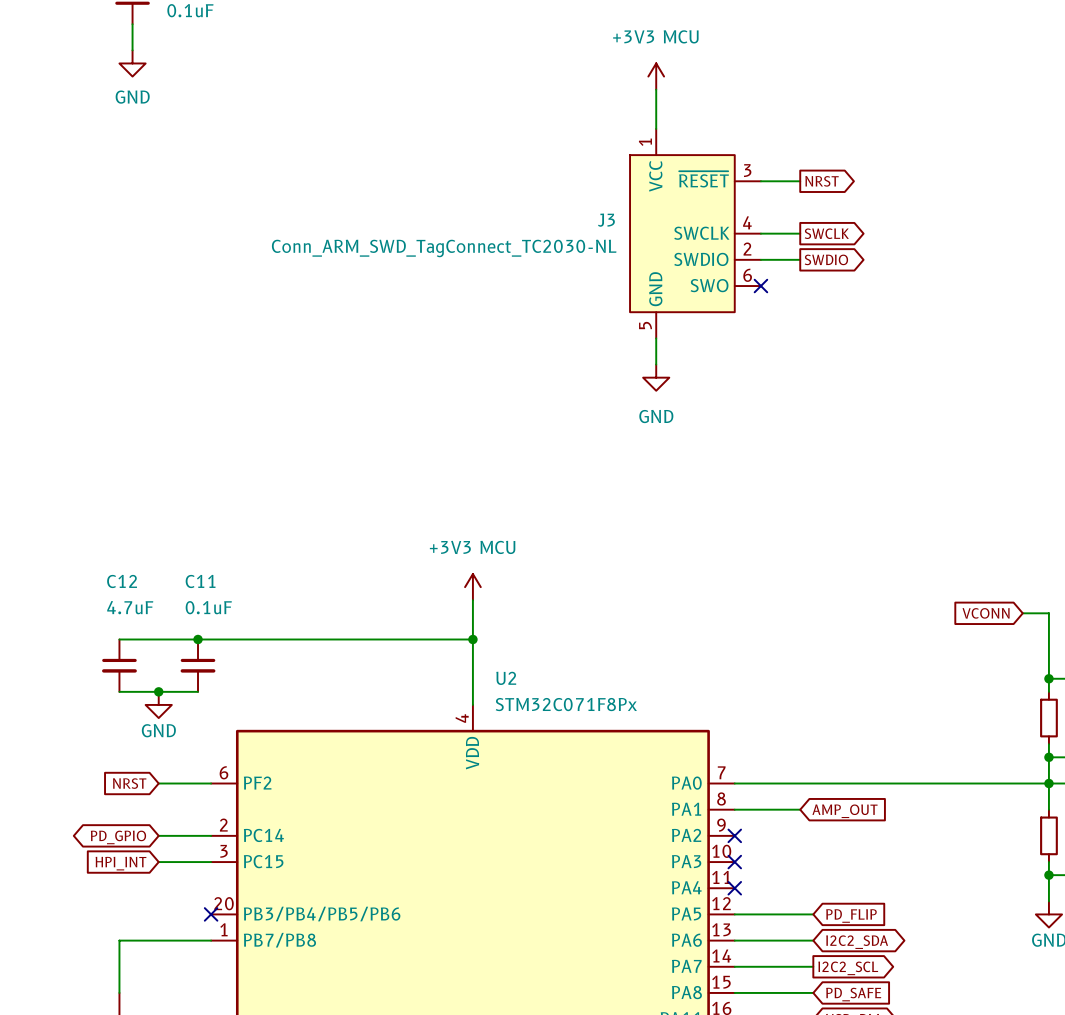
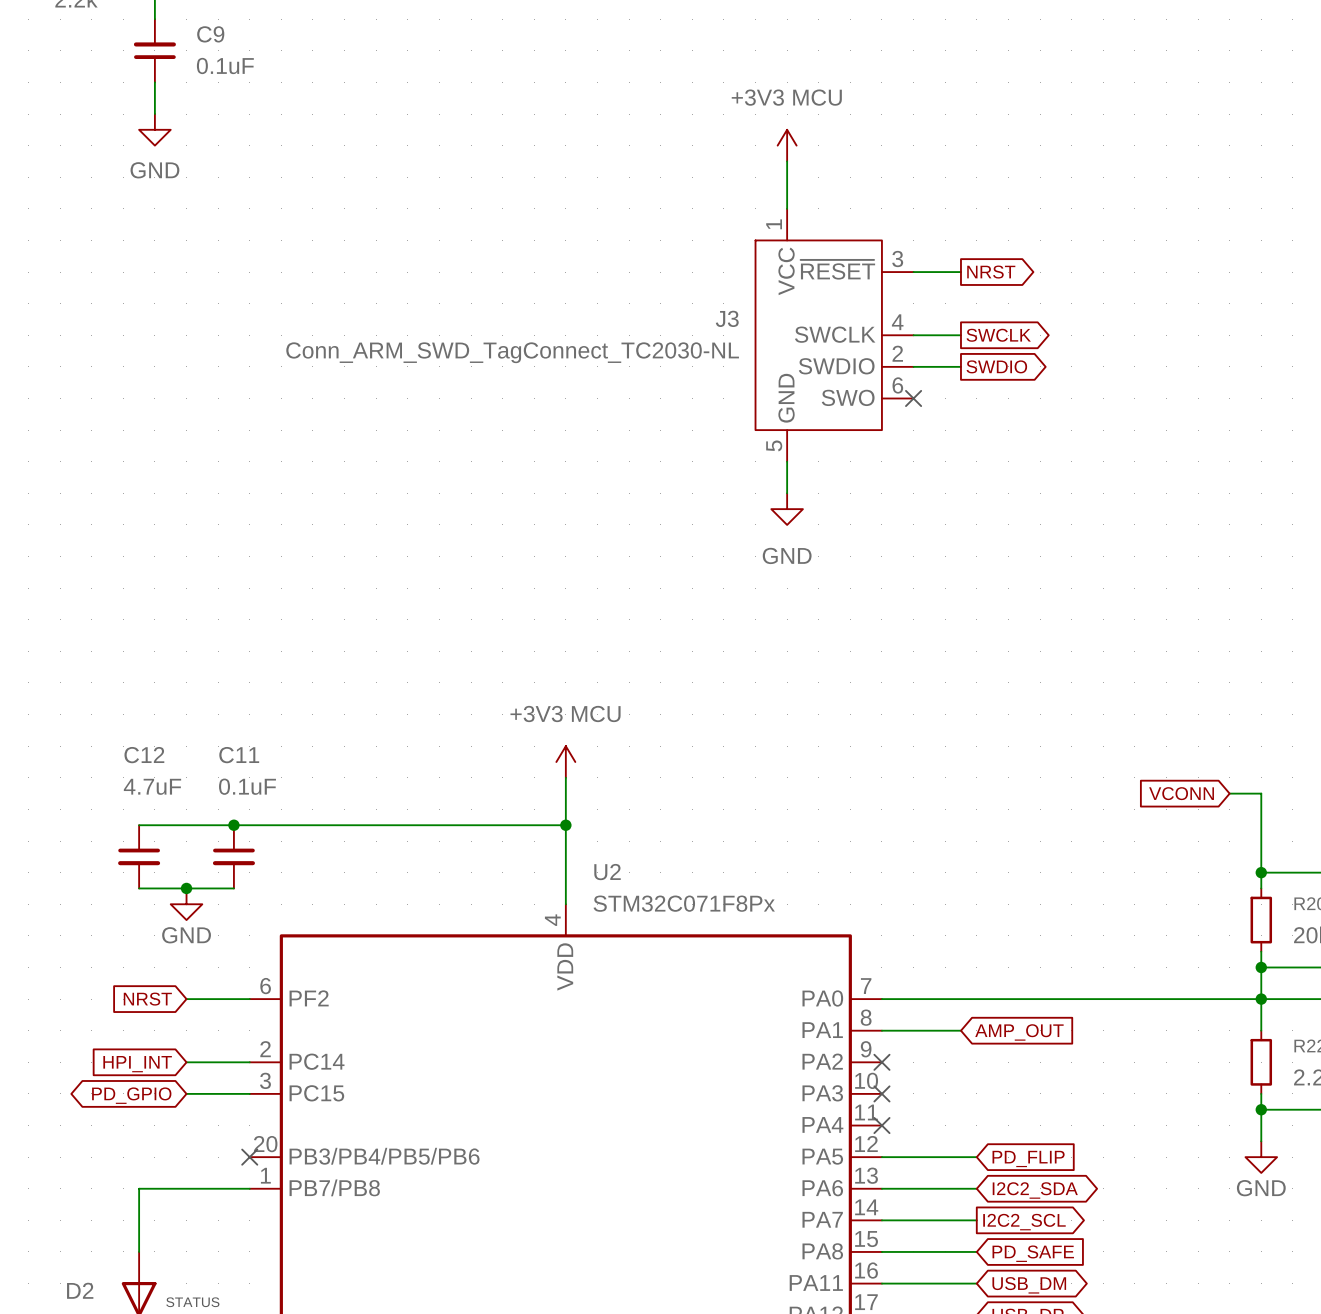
global label shape: bidirectional (118, 837) -> input (137, 1064)
global label: PD_GPIO (118, 837) -> HPI_INT (137, 1064)
global label shape: input (120, 863) -> bidirectional (131, 1095)
global label: HPI_INT (120, 863) -> PD_GPIO (131, 1095)

